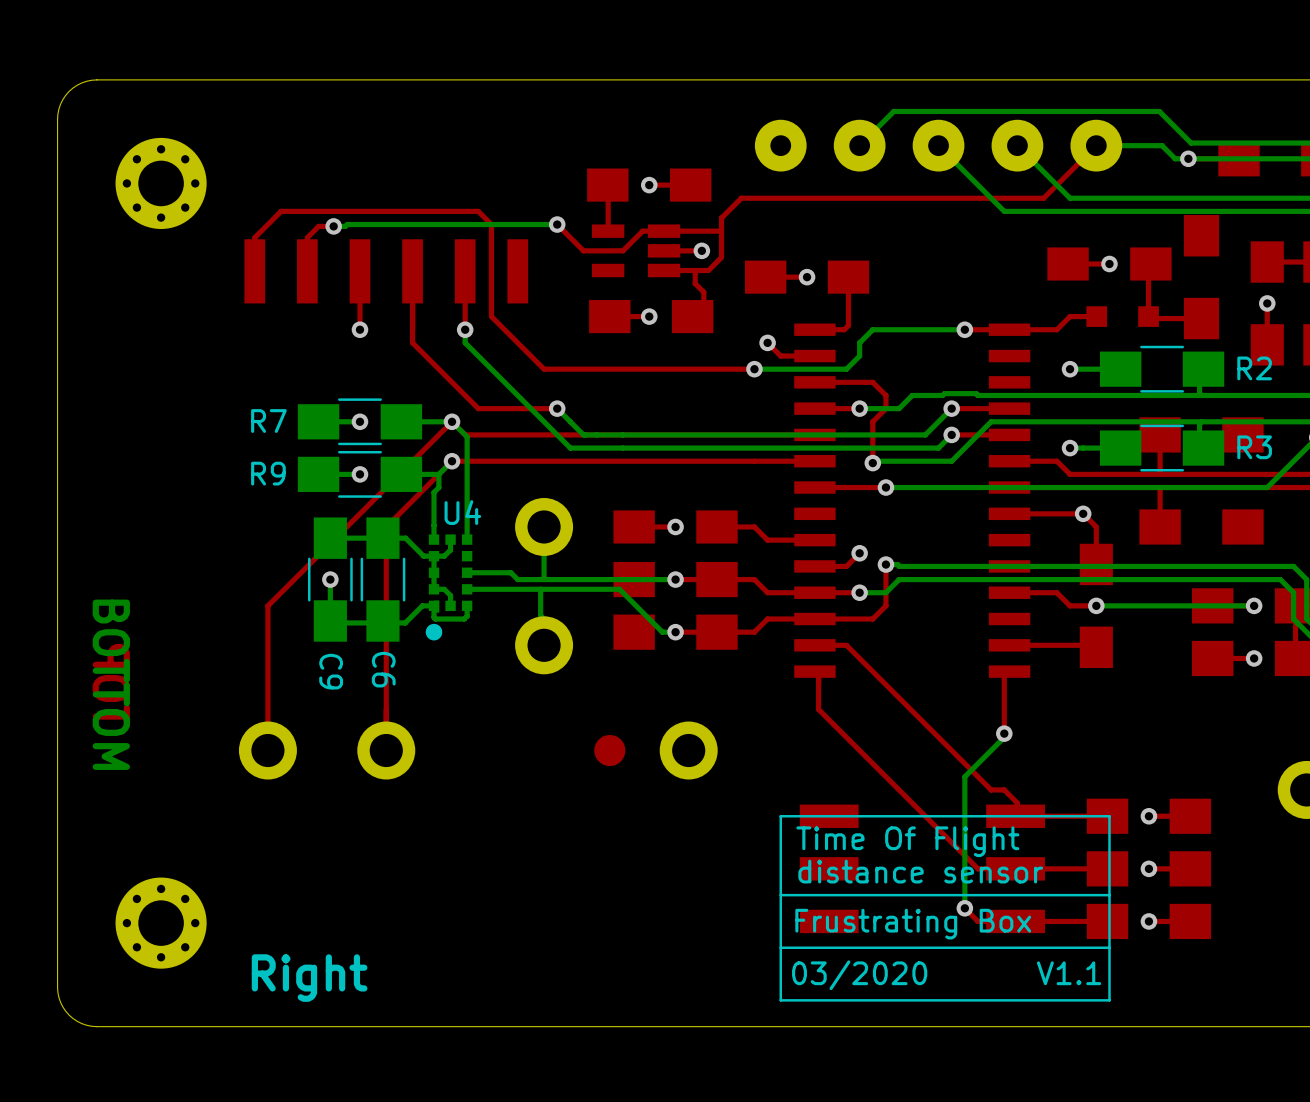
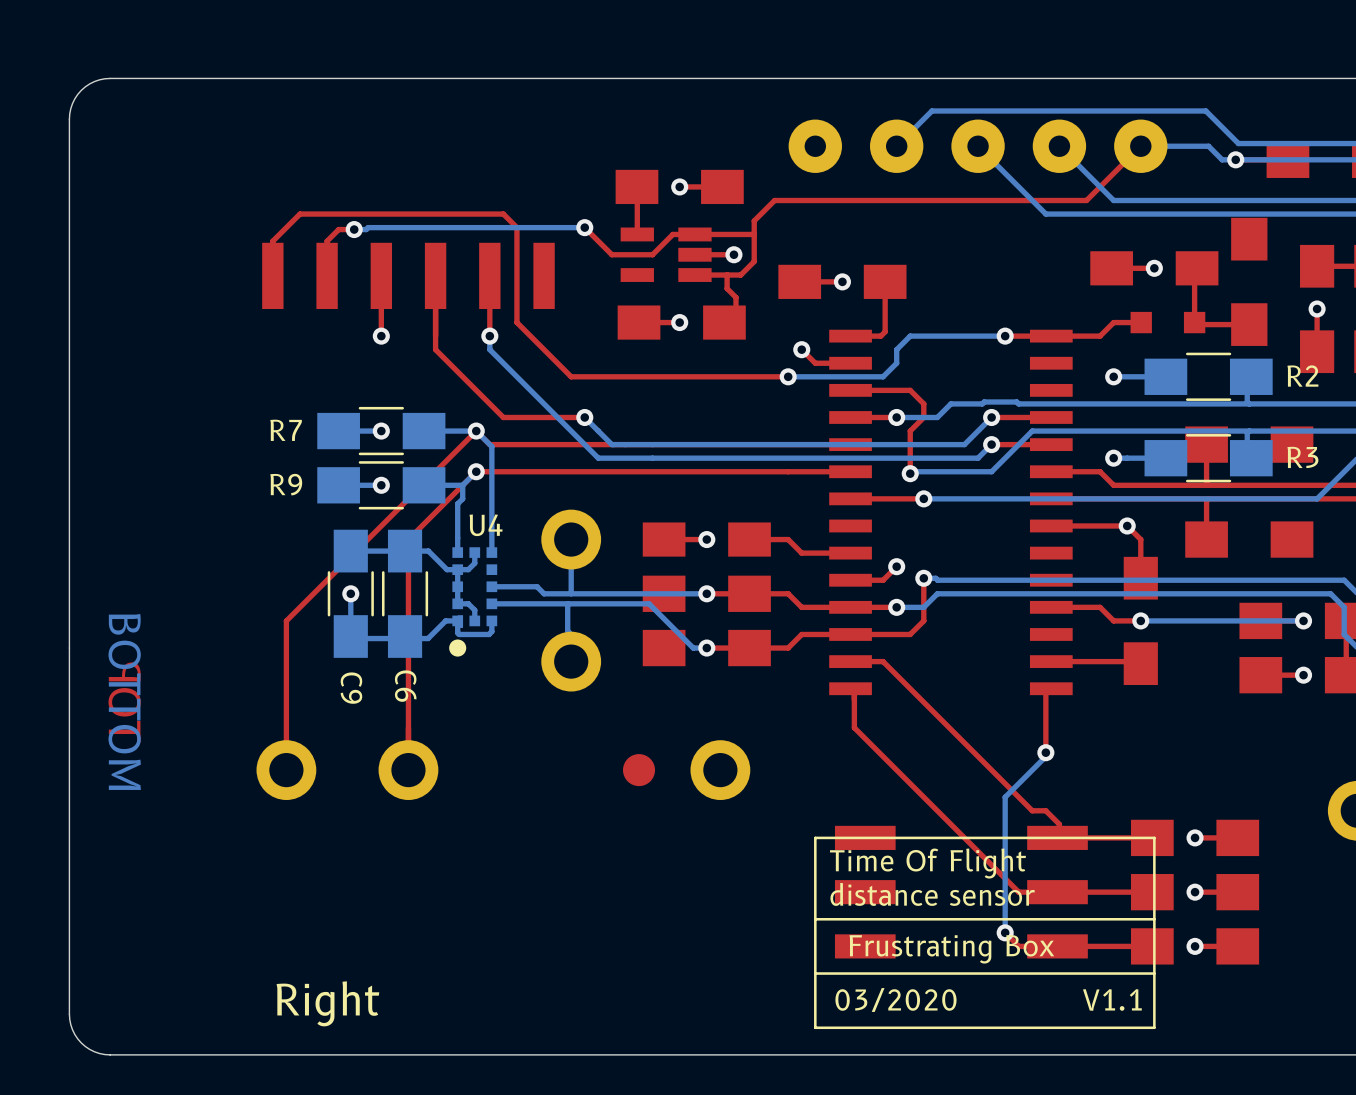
part: (161, 183) -> none
part: (161, 923) -> none

